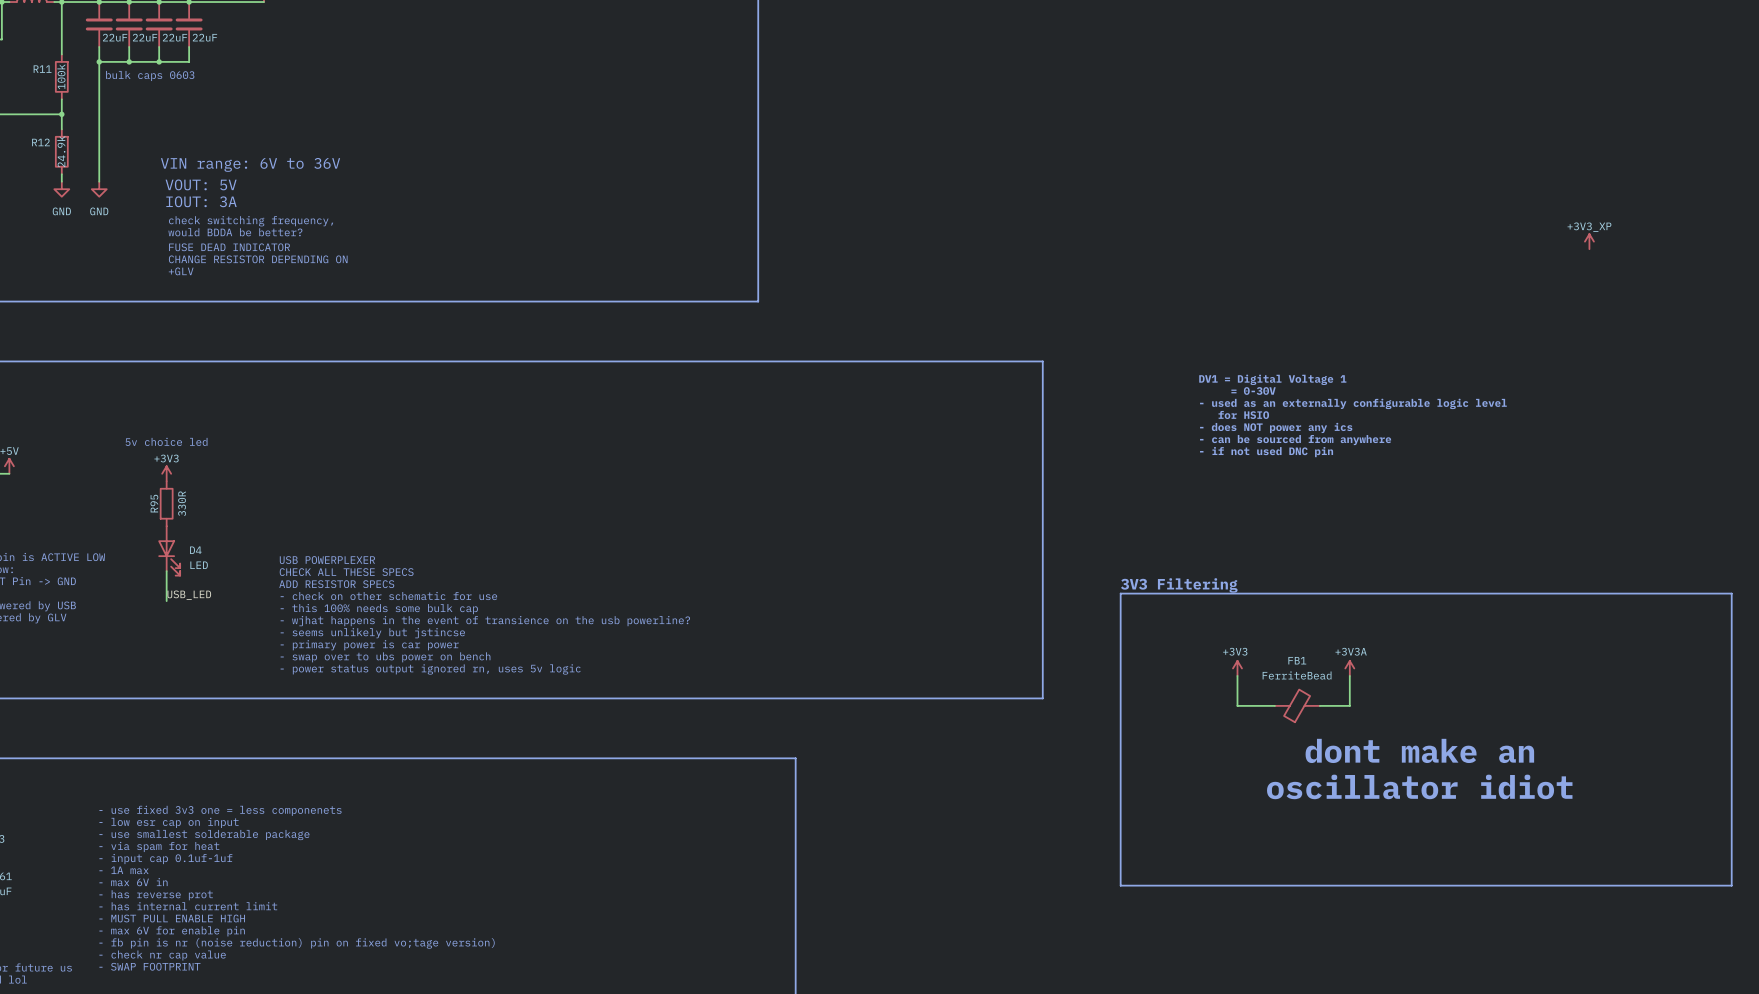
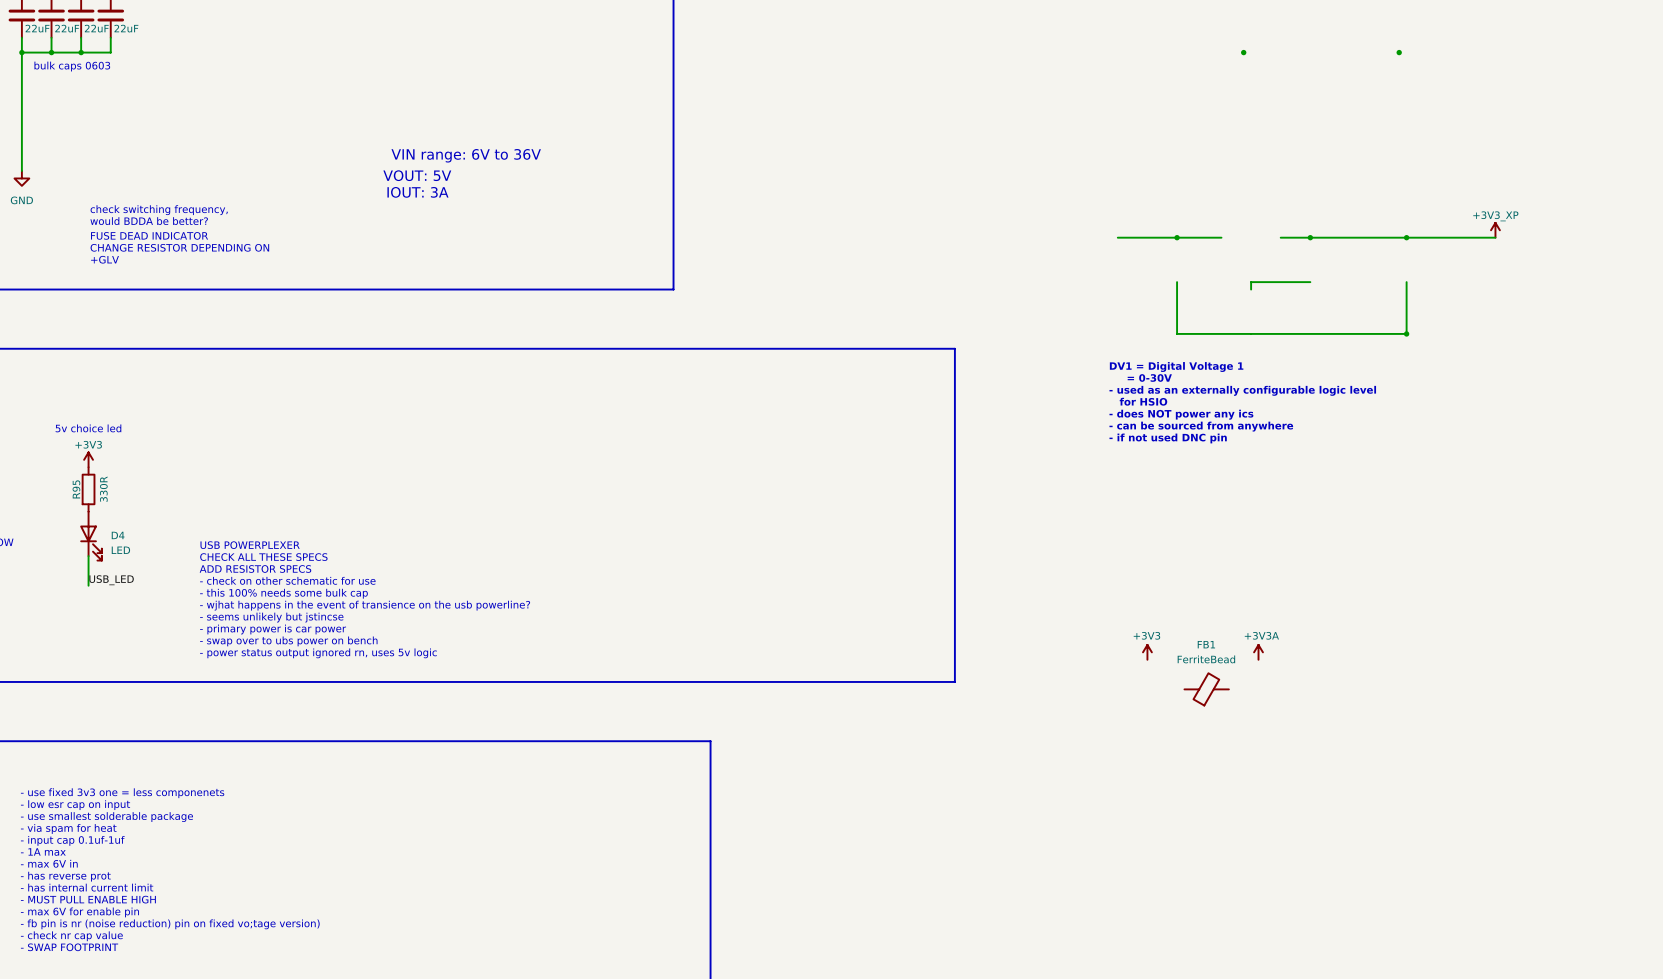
junction: none -> (1243, 52)
junction: none -> (1399, 52)
text: VIN range: 6V to 36V (250, 164) -> none
text: none -> VIN range: 6V to 36V (466, 155)
text: VOUT: 5V (201, 184) -> none
text: none -> VOUT: 5V (417, 175)
text: IOUT: 3A (201, 201) -> none
text: none -> IOUT: 3A (417, 192)
wire: none -> (1117, 237) (1221, 237)
junction: none -> (1177, 237)
wire: none -> (1280, 237) (1495, 237)
junction: none -> (1310, 237)
junction: none -> (1406, 237)
wire: none -> (1177, 282) (1177, 333) (1406, 333) (1406, 282)
wire: none -> (1310, 282) (1251, 282) (1251, 289)
junction: none -> (1406, 333)
text: 3V3 Filtering (1179, 585) -> none
line: (1120, 593) (1731, 593) (1731, 885) (1120, 885) (1120, 593) -> none
wire: (1237, 675) (1237, 705) (1274, 705) -> none
wire: (1349, 675) (1349, 705) (1319, 705) -> none
text: dont make an (1419, 750) -> none
text: oscillator idiot (1419, 786) -> none

